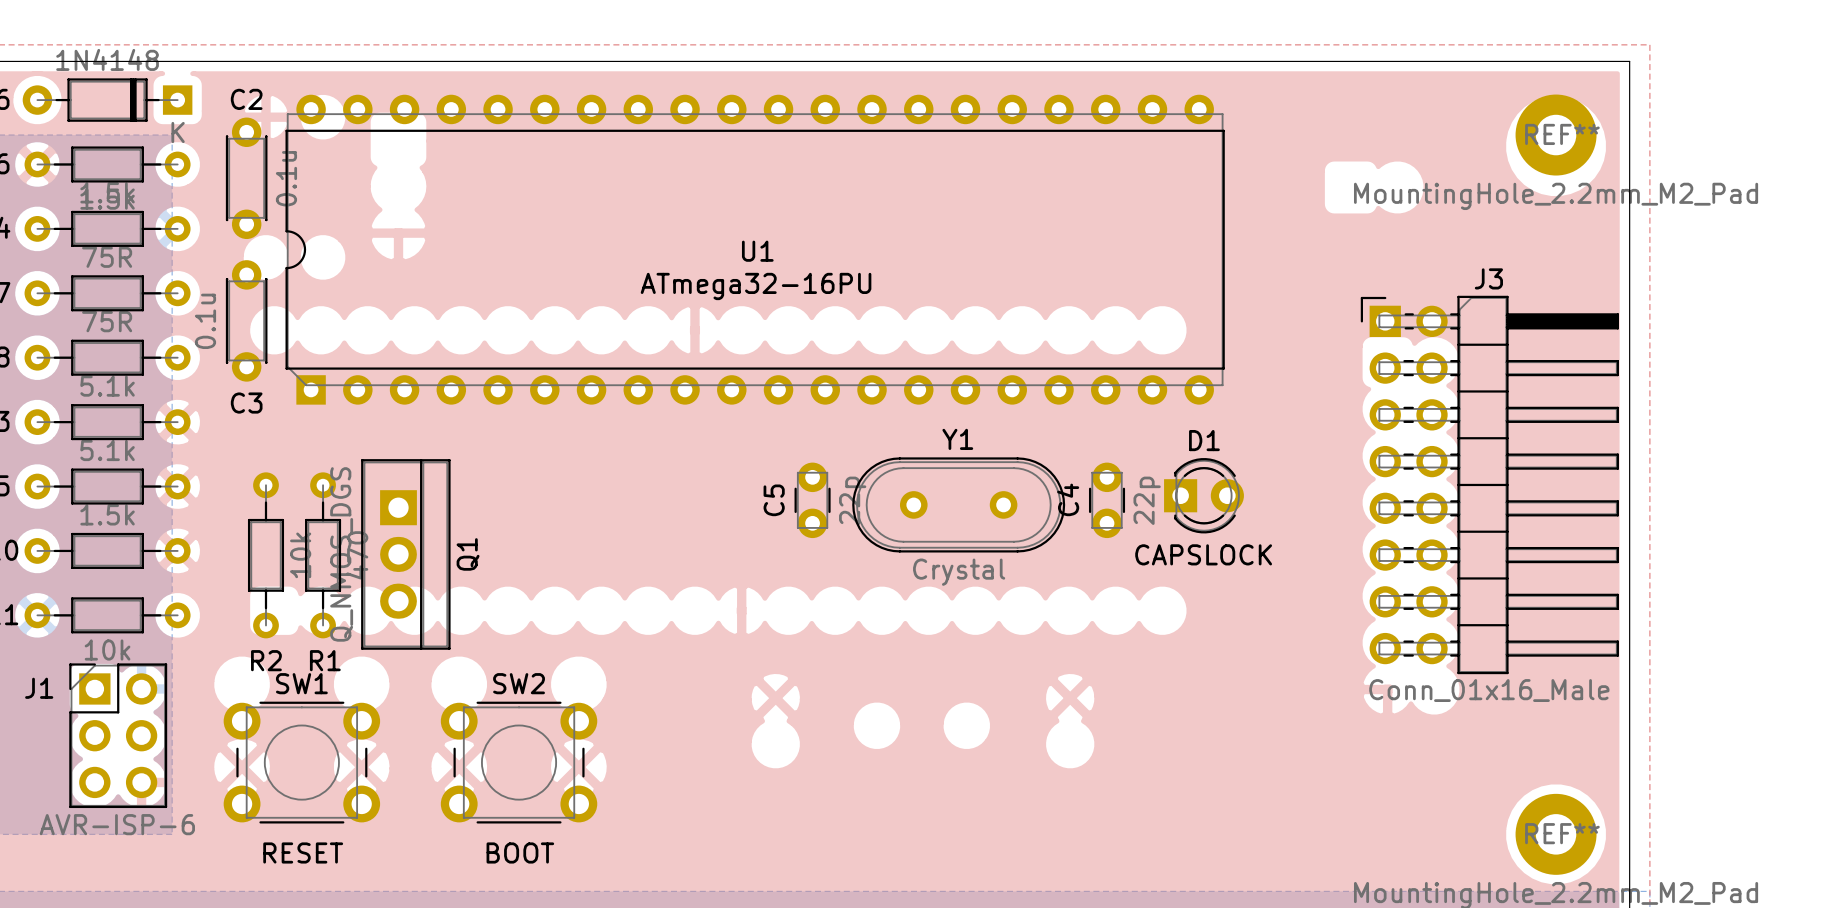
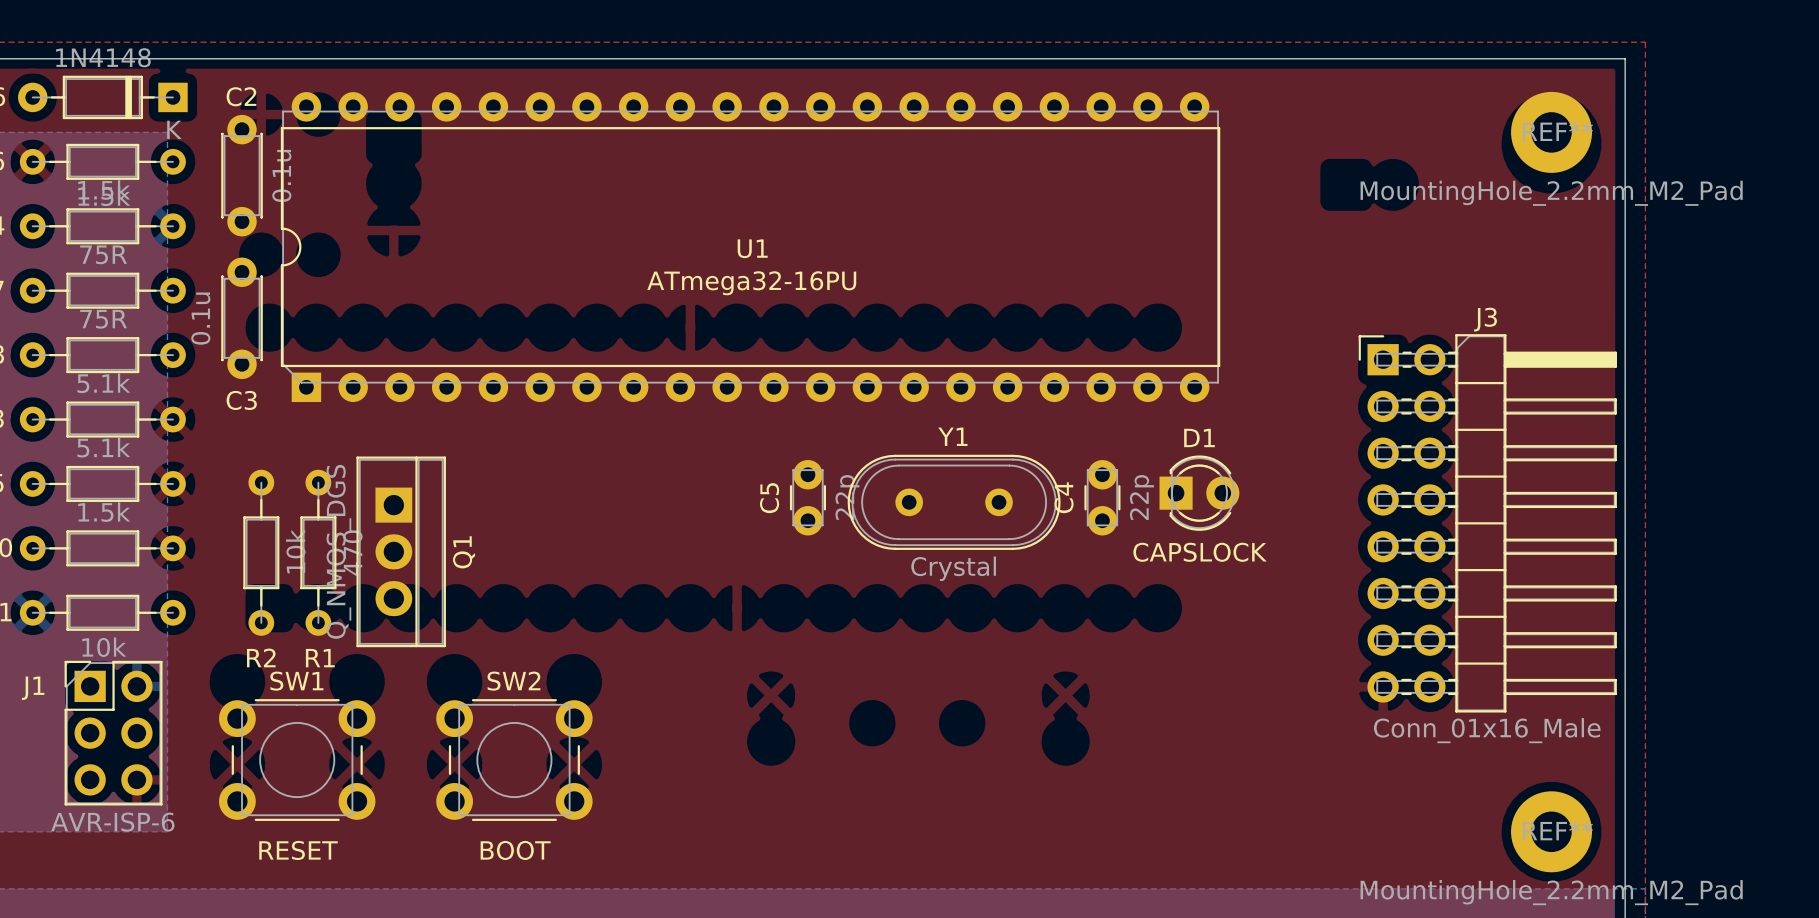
J3 position: (1489, 484) -> (1487, 523)

